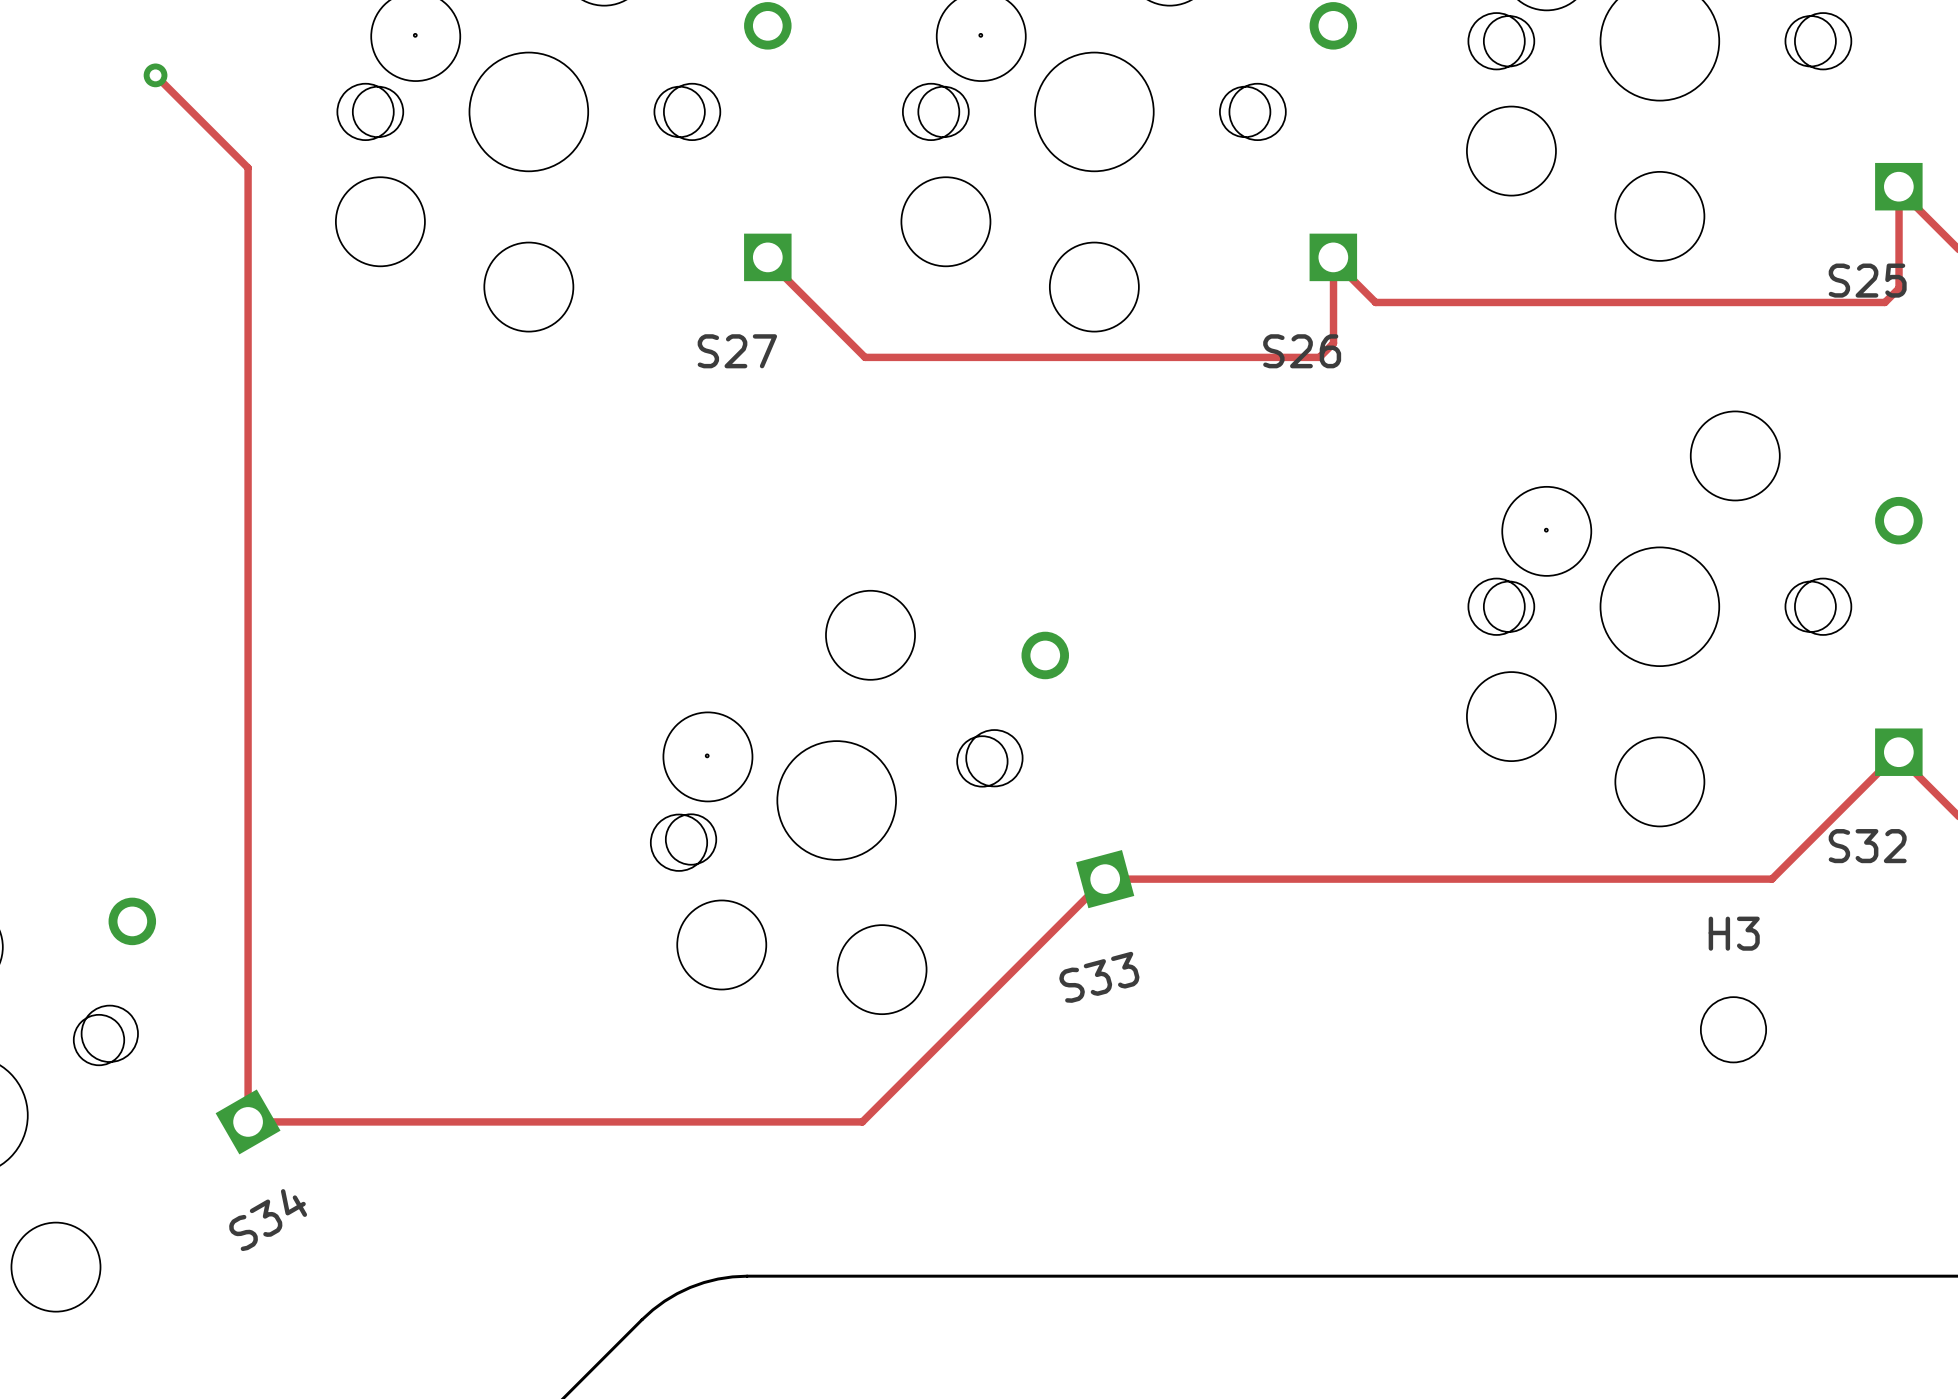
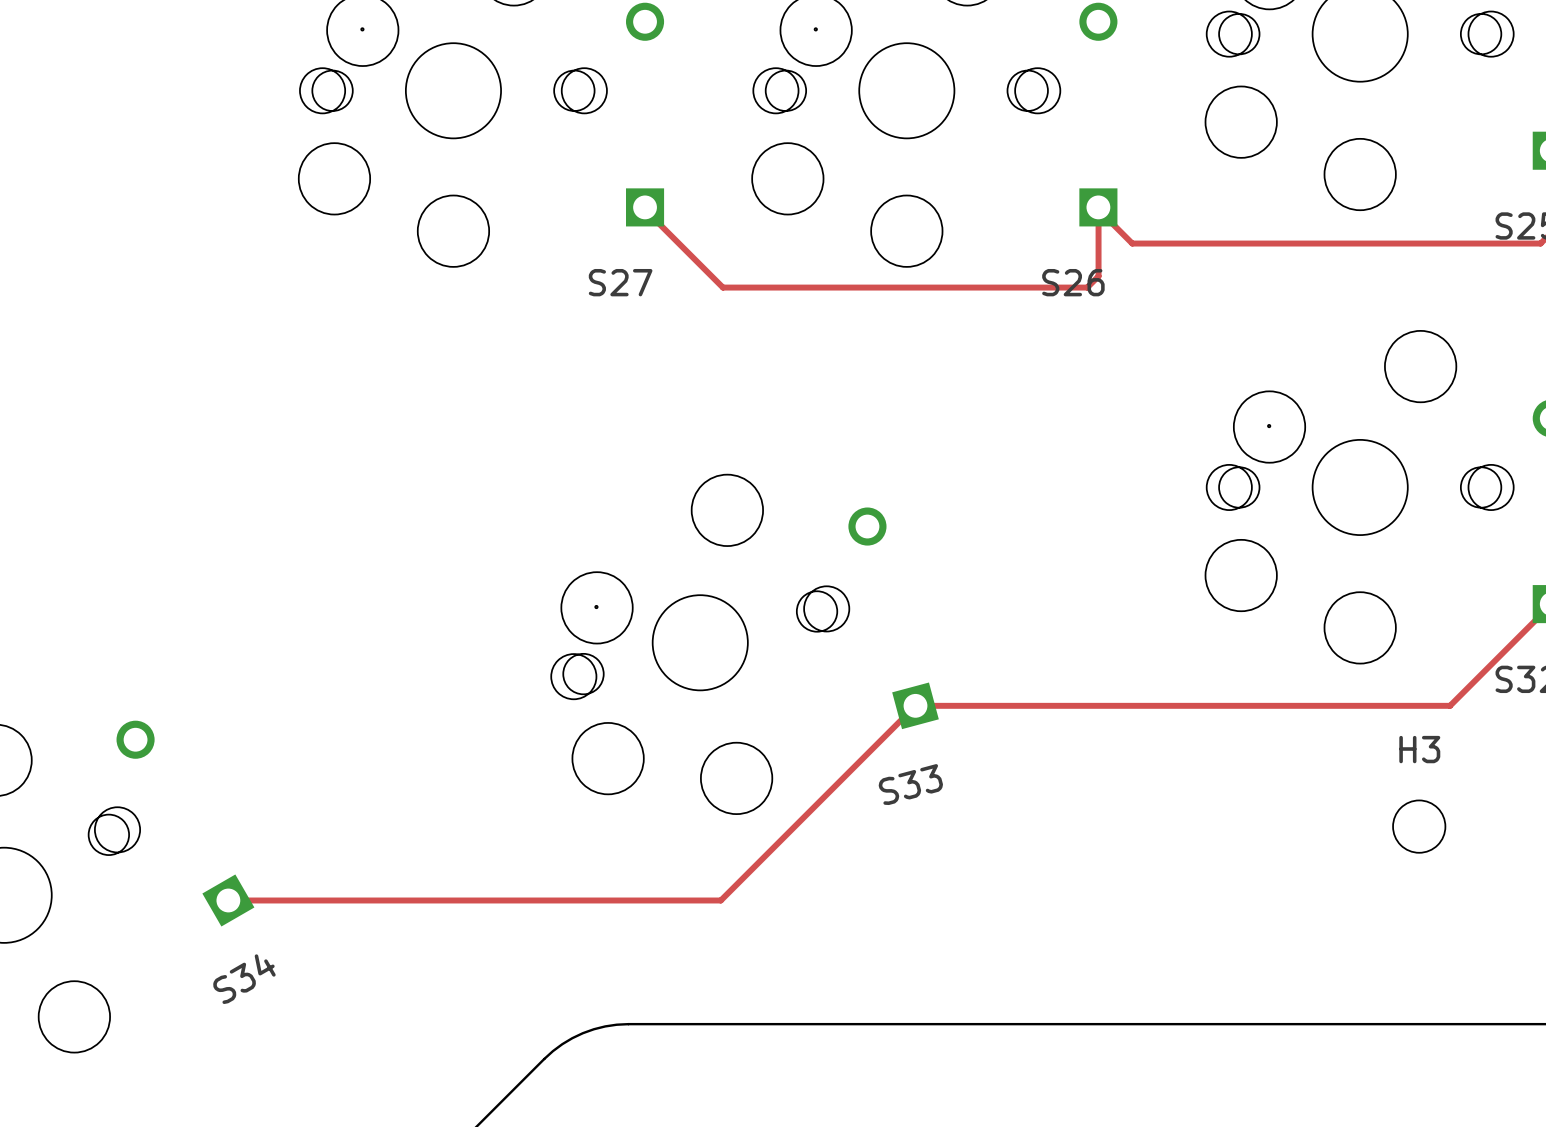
track: (155, 75) (248, 167) (248, 1121) -> none
via: (155, 75) -> none

